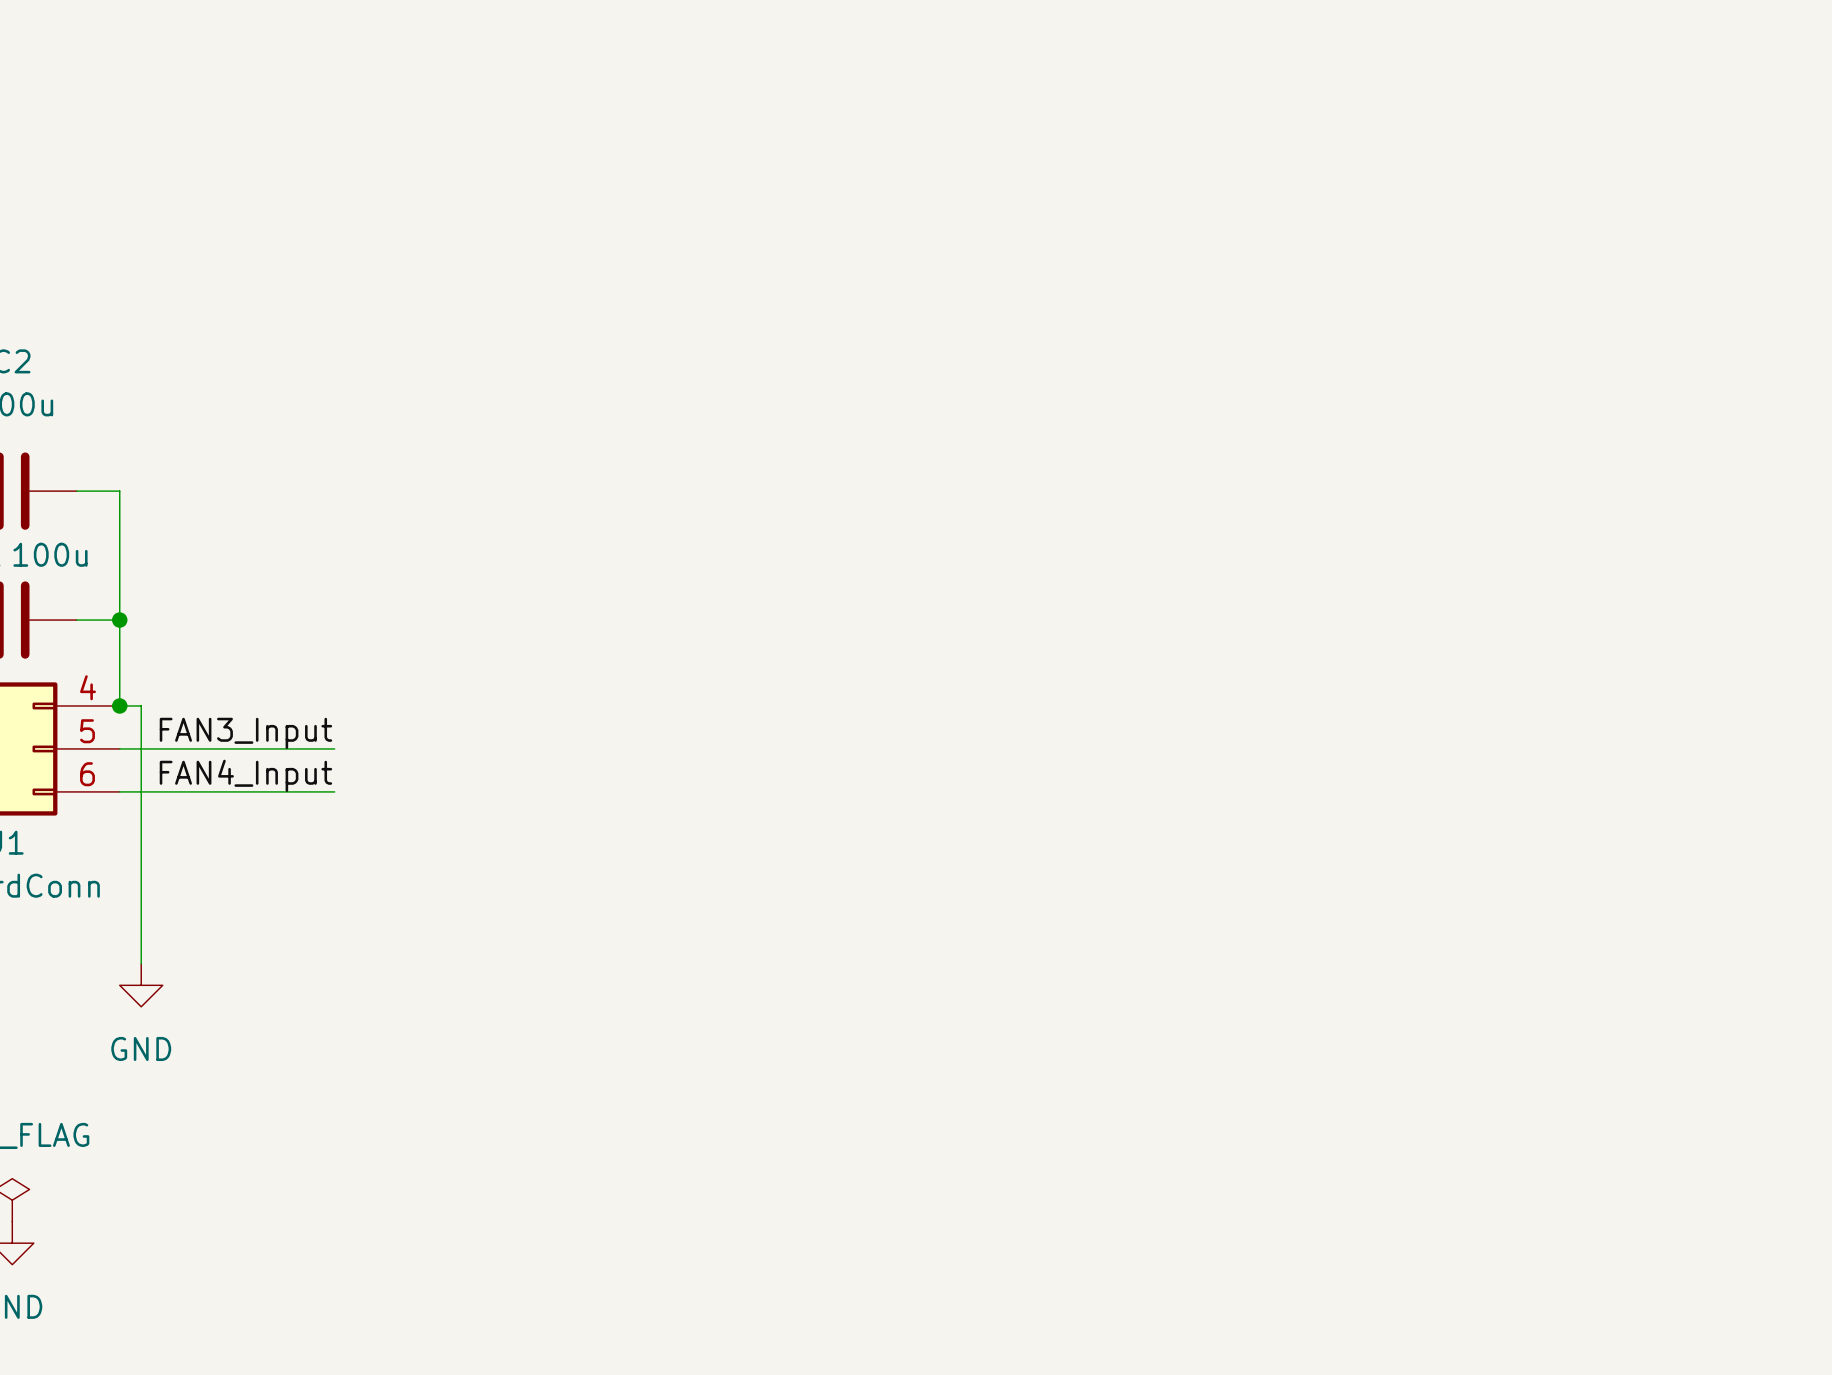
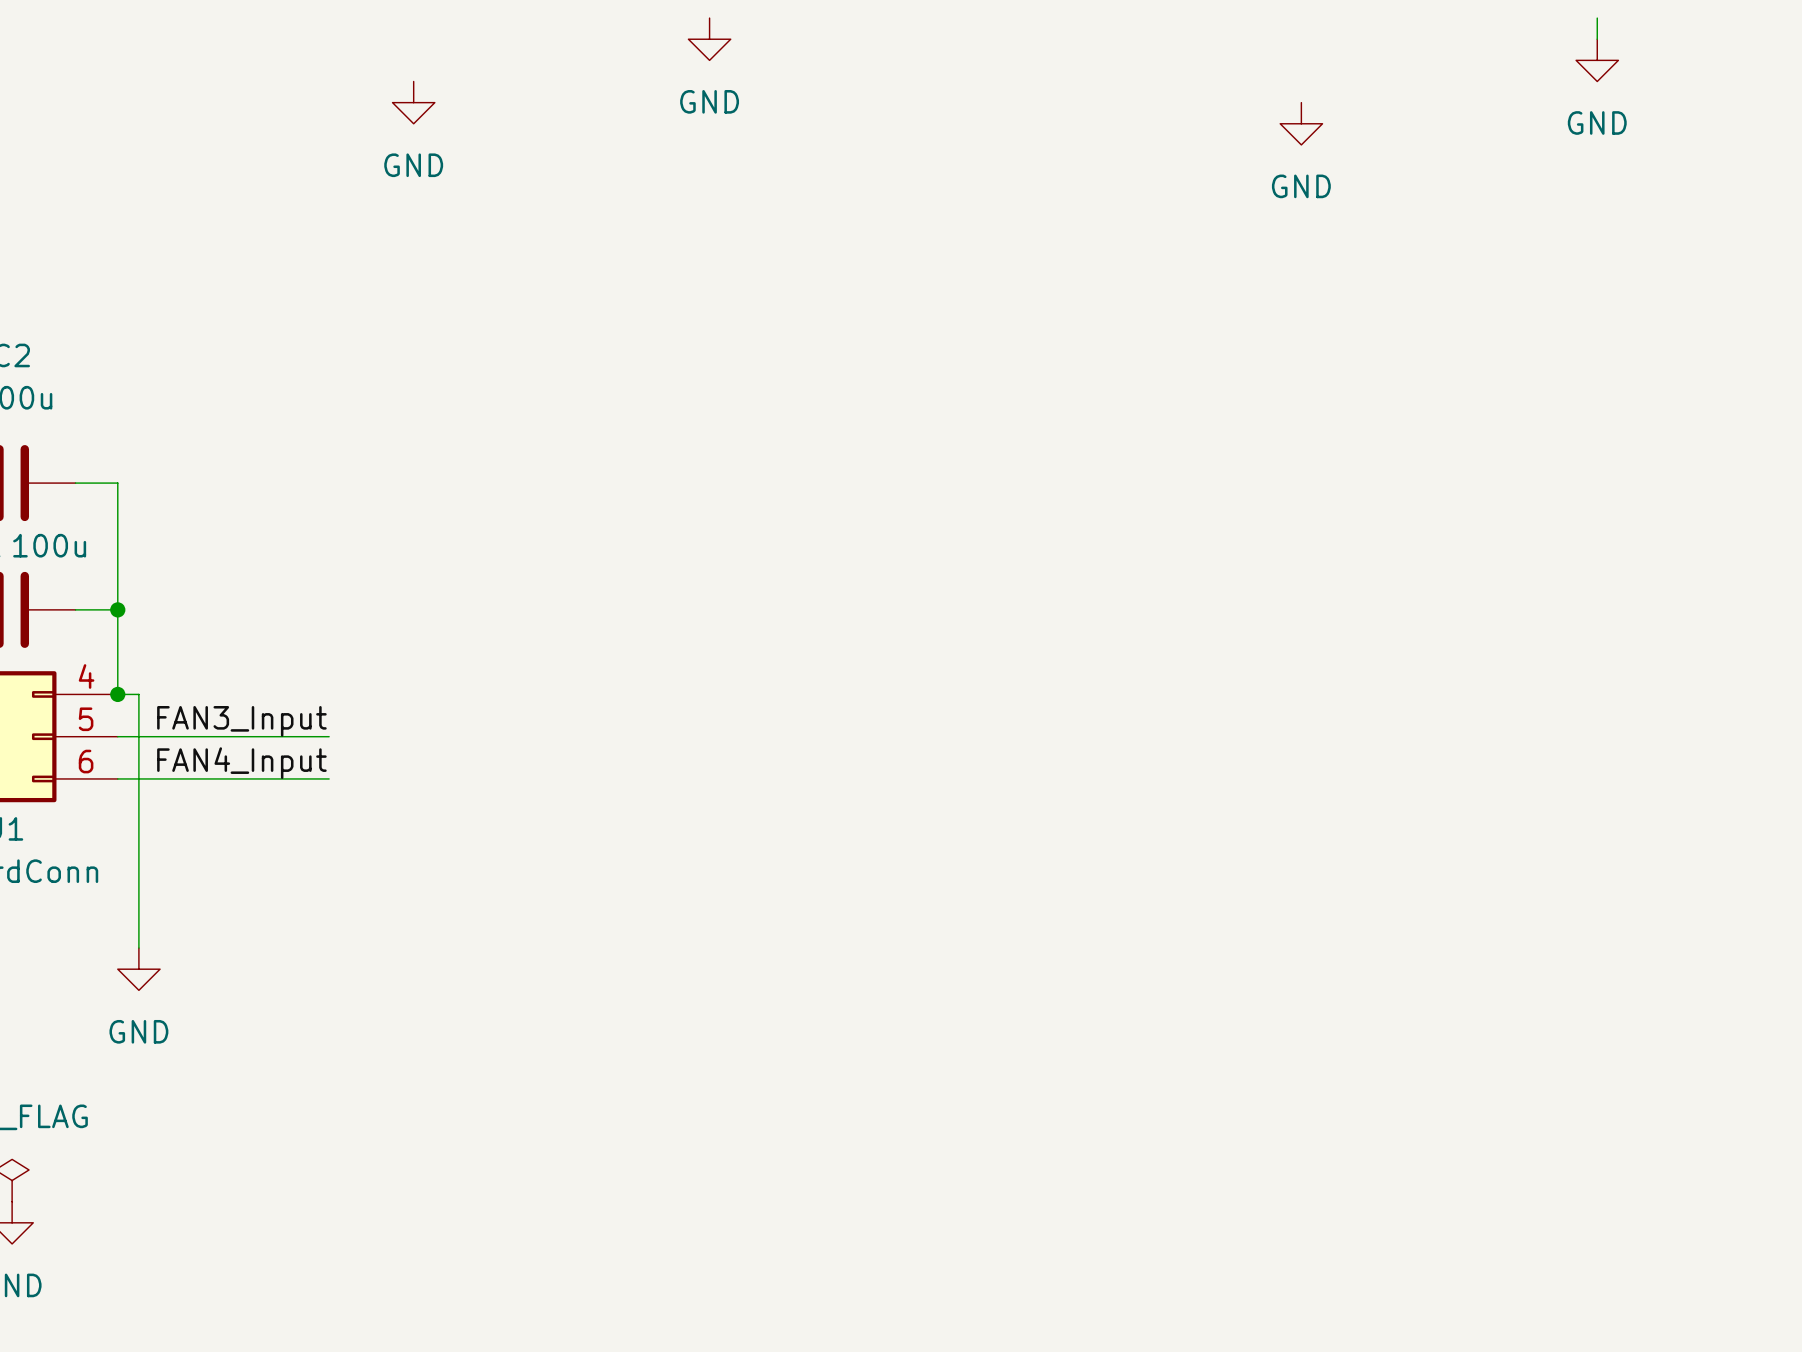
wire: none -> (1597, 18) (1597, 39)
power symbol: none -> GND (709, 39)
power symbol: none -> GND (1597, 60)
power symbol: none -> GND (413, 102)
power symbol: none -> GND (1301, 123)

